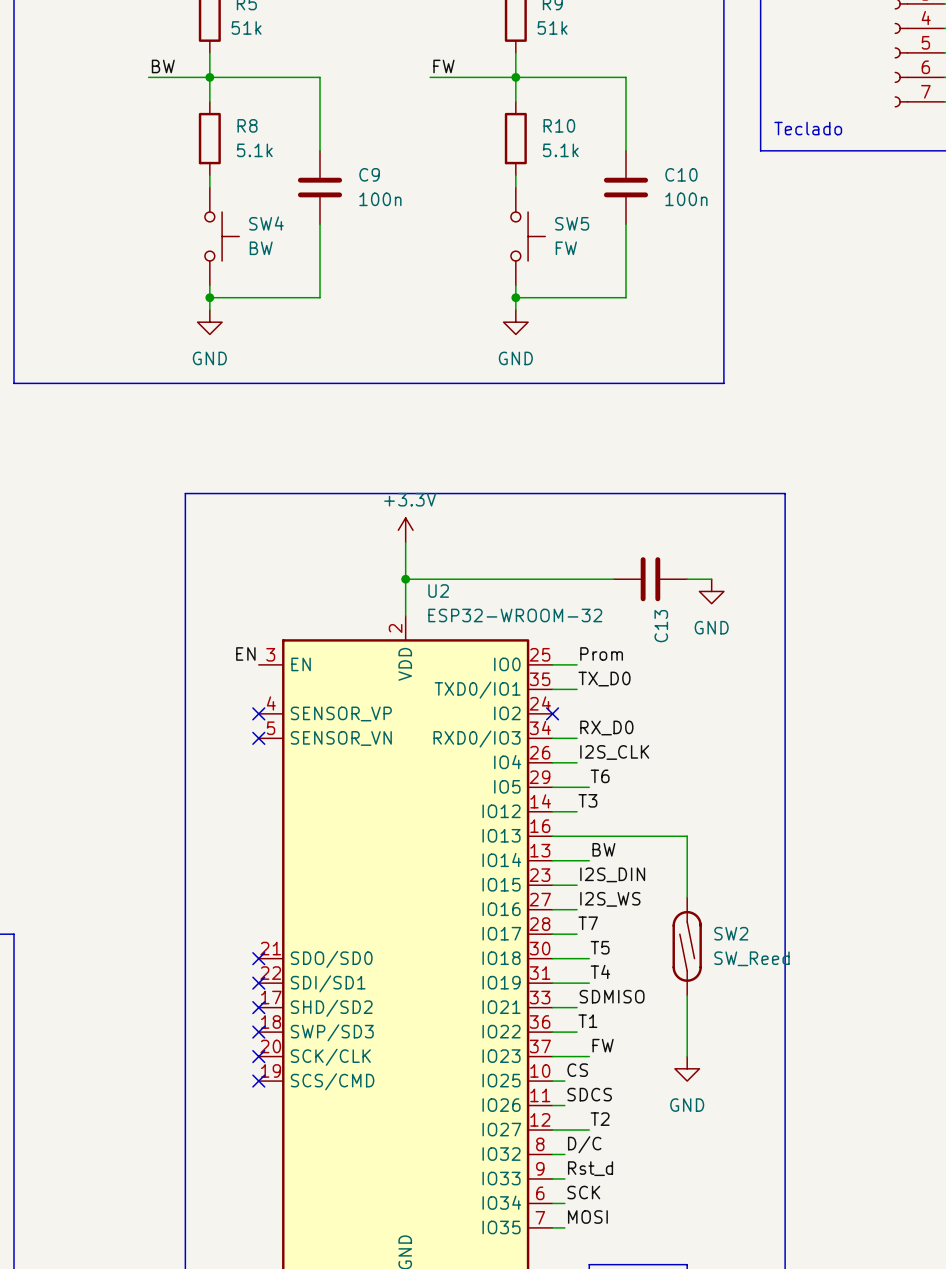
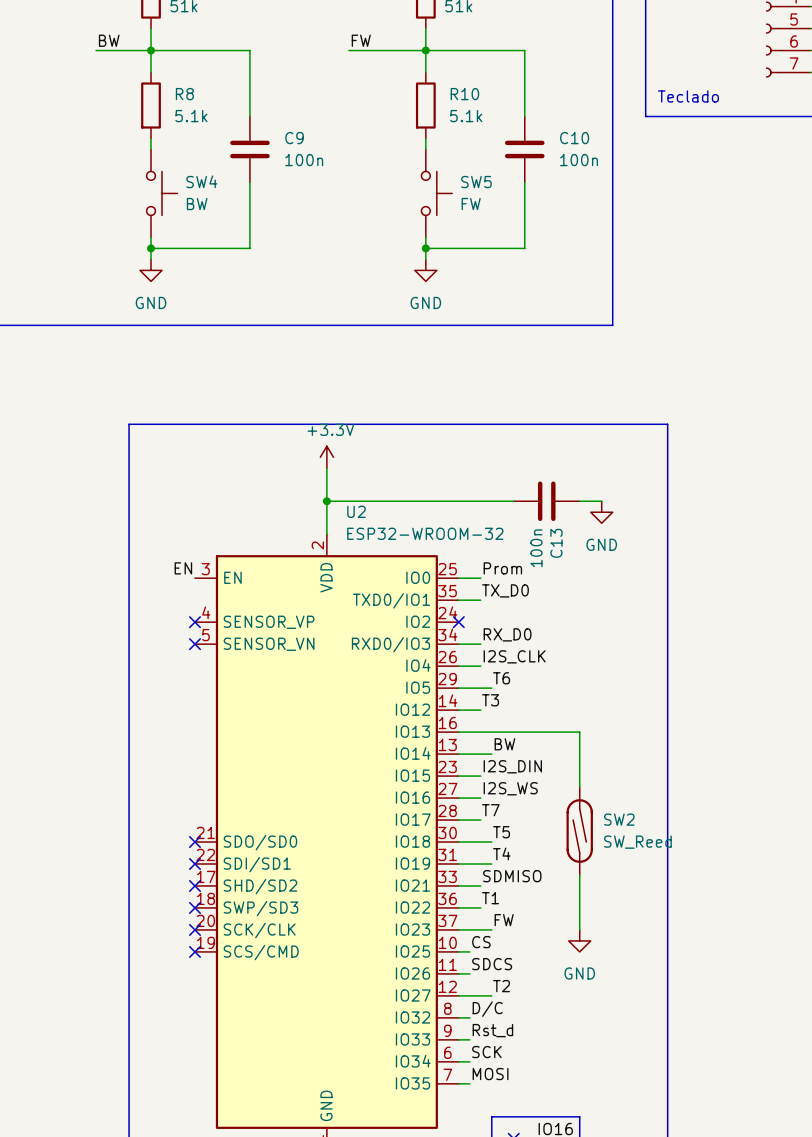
C13 value: none -> 100n (536, 548)

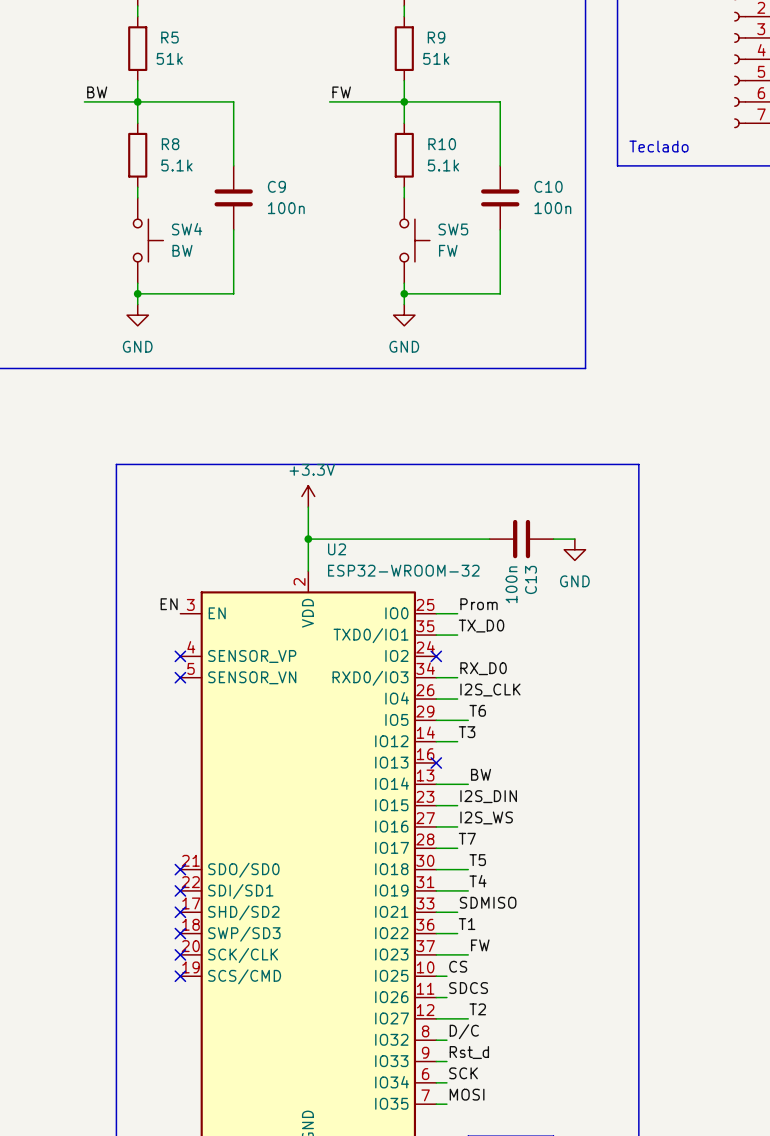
wire: (458, 732) (579, 732) (579, 787) -> none
no-connect mark: none -> (436, 762)
SW2: SW_Reed (579, 831) -> none
wire: (579, 874) (579, 929) -> none
power symbol: GND (579, 940) -> none

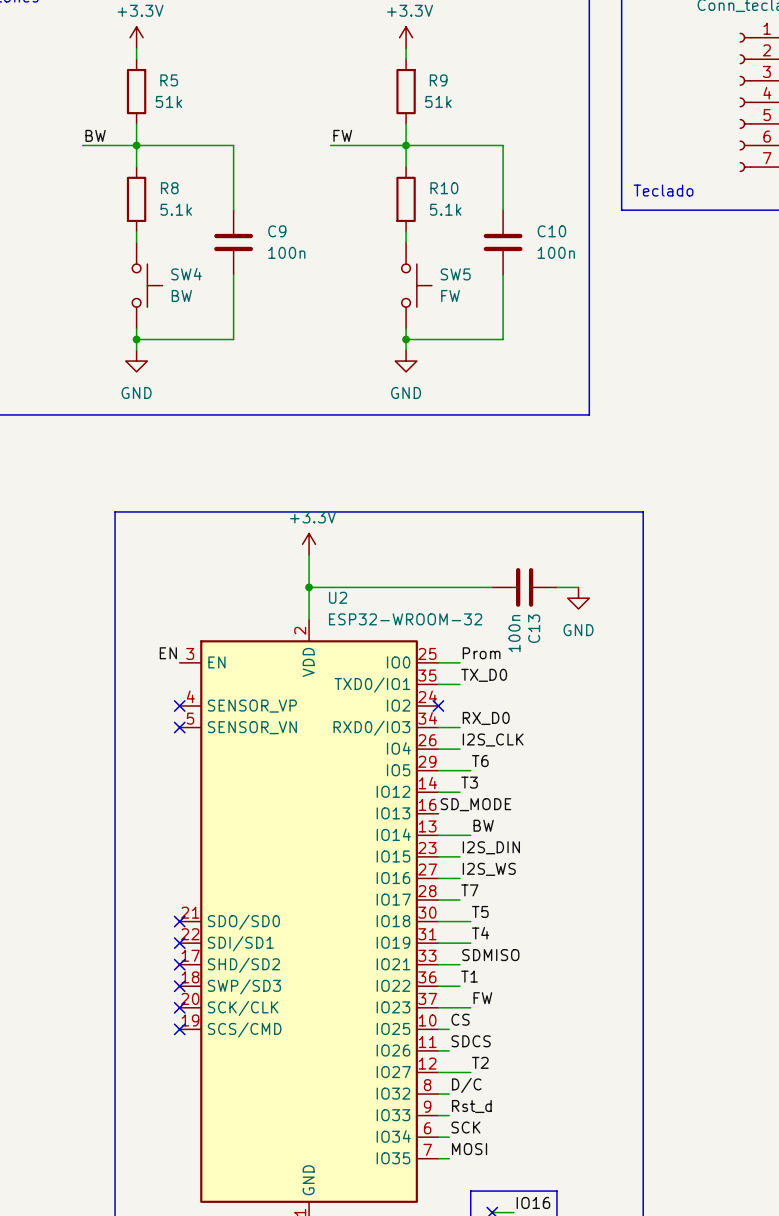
label: none -> SD_MODE (475, 804)
no-connect mark: (436, 762) -> none

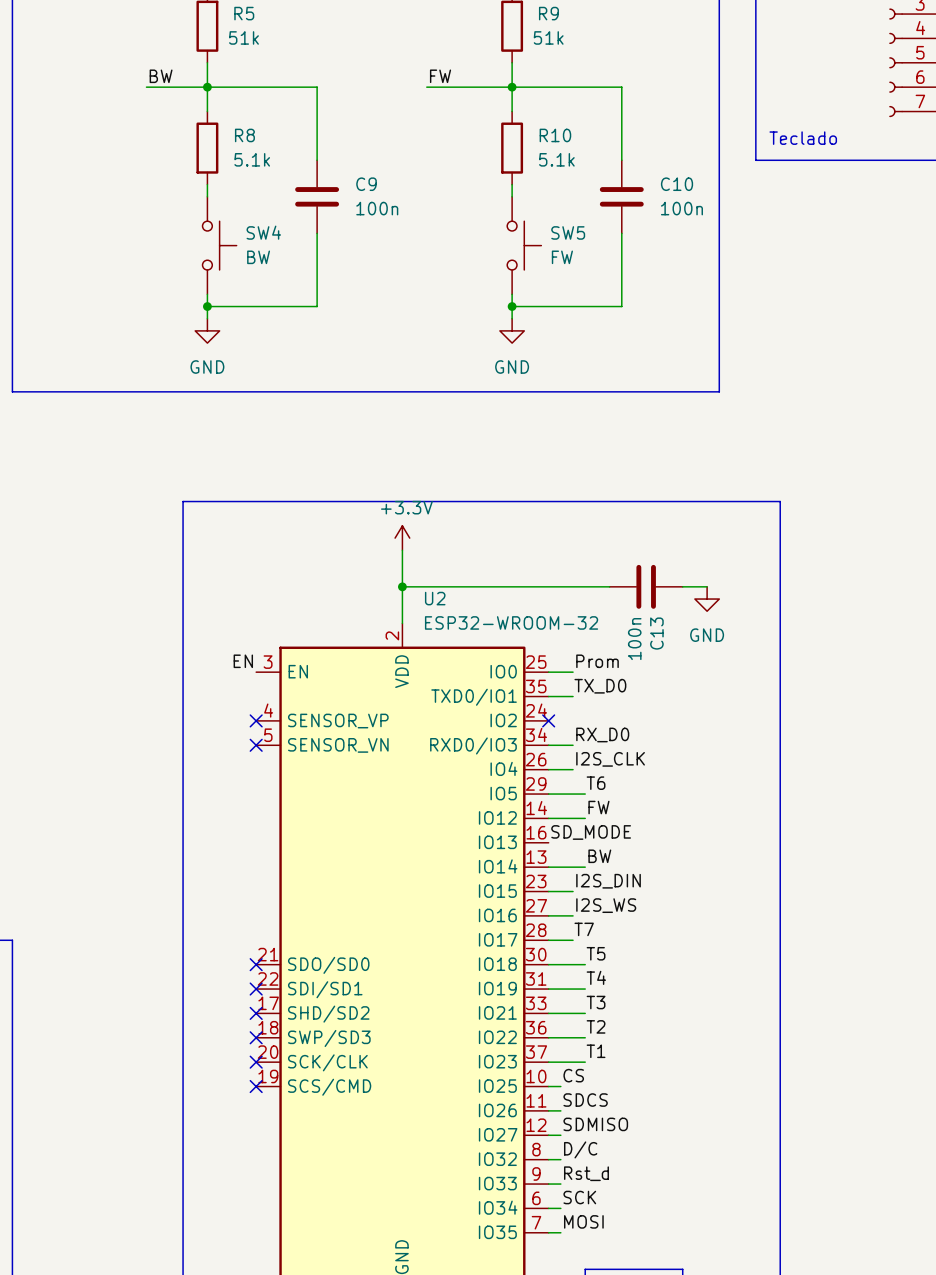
label position: T3 (469, 782) -> T3 (596, 1002)
label: none -> FW (598, 807)
wire: none -> (573, 818) (585, 818)
label position: SDMISO (490, 955) -> SDMISO (595, 1124)
wire: none -> (573, 1013) (585, 1013)
label: T1 (469, 976) -> none
wire: none -> (573, 1037) (585, 1037)
label: FW (482, 998) -> T1 (596, 1051)
label position: T2 (480, 1062) -> T2 (596, 1026)
wire: (449, 1072) (470, 1072) -> none

